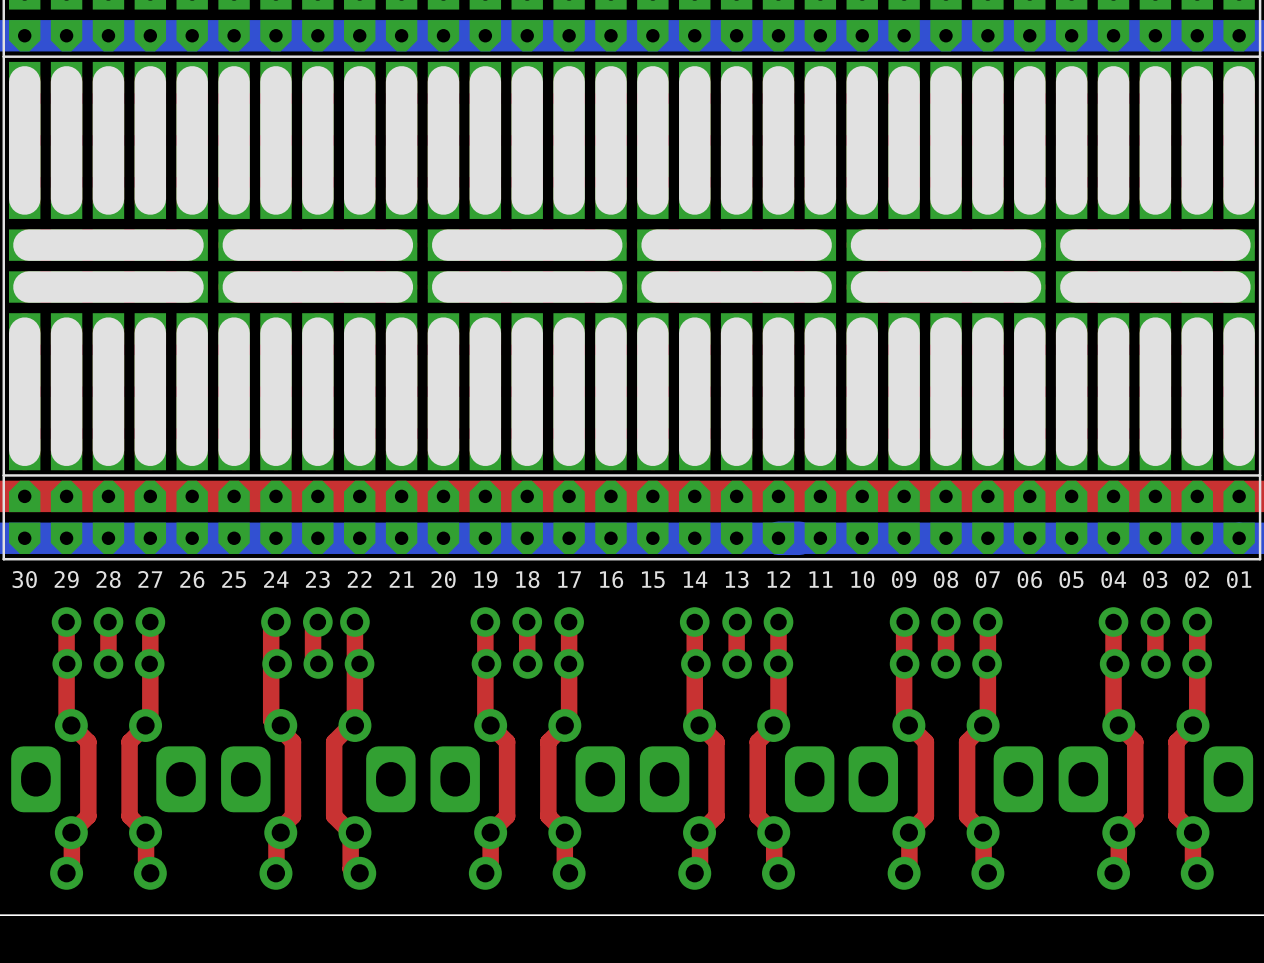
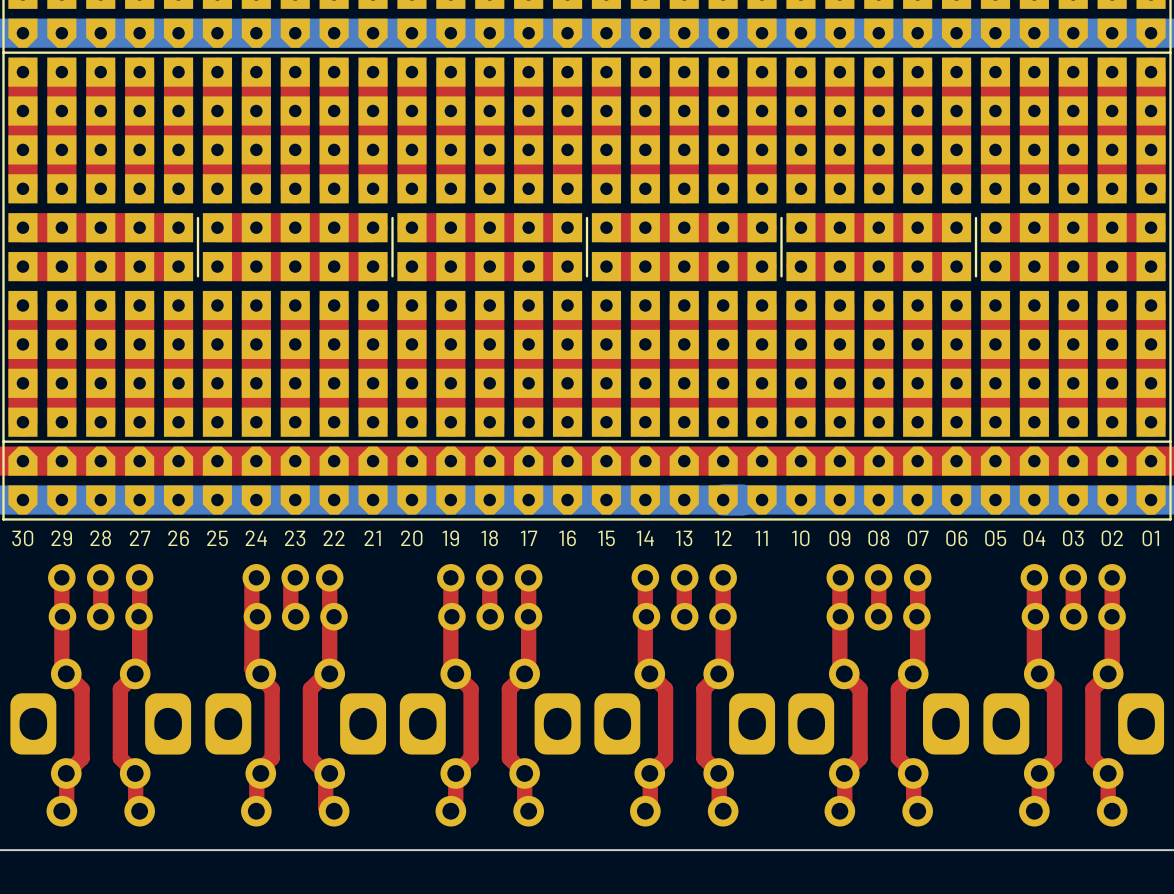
line: (24, 81) (24, 199) -> none
line: (66, 81) (66, 199) -> none
line: (108, 81) (108, 199) -> none
line: (150, 81) (150, 199) -> none
line: (192, 81) (192, 199) -> none
line: (234, 81) (234, 199) -> none
line: (275, 81) (275, 199) -> none
line: (317, 81) (317, 199) -> none
line: (359, 81) (359, 199) -> none
line: (401, 81) (401, 199) -> none
line: (443, 81) (443, 199) -> none
line: (485, 81) (485, 199) -> none
line: (527, 81) (527, 199) -> none
line: (569, 81) (569, 199) -> none
line: (610, 81) (610, 199) -> none
line: (652, 81) (652, 199) -> none
line: (694, 81) (694, 199) -> none
line: (736, 81) (736, 199) -> none
line: (778, 81) (778, 199) -> none
line: (820, 81) (820, 199) -> none
line: (862, 81) (862, 199) -> none
line: (904, 81) (904, 199) -> none
line: (946, 81) (946, 199) -> none
line: (987, 81) (987, 199) -> none
line: (1029, 81) (1029, 199) -> none
line: (1071, 81) (1071, 199) -> none
line: (1113, 81) (1113, 199) -> none
line: (1155, 81) (1155, 199) -> none
line: (1197, 81) (1197, 199) -> none
line: (1239, 81) (1239, 199) -> none
line: none -> (198, 217) (198, 276)
line: none -> (392, 217) (392, 276)
line: none -> (587, 217) (587, 276)
line: none -> (781, 217) (781, 276)
line: none -> (976, 217) (976, 276)
line: (188, 245) (28, 245) -> none
line: (397, 245) (238, 245) -> none
line: (606, 245) (447, 245) -> none
line: (816, 245) (657, 245) -> none
line: (1025, 245) (866, 245) -> none
line: (1234, 245) (1075, 245) -> none
line: (188, 287) (28, 287) -> none
line: (397, 287) (238, 287) -> none
line: (606, 287) (447, 287) -> none
line: (816, 287) (657, 287) -> none
line: (1025, 287) (866, 287) -> none
line: (1234, 287) (1075, 287) -> none
line: (24, 333) (24, 450) -> none
line: (66, 333) (66, 450) -> none
line: (108, 333) (108, 450) -> none
line: (150, 333) (150, 450) -> none
line: (192, 333) (192, 450) -> none
line: (234, 333) (234, 450) -> none
line: (275, 333) (275, 450) -> none
line: (317, 333) (317, 450) -> none
line: (359, 333) (359, 450) -> none
line: (401, 333) (401, 450) -> none
line: (443, 333) (443, 450) -> none
line: (485, 333) (485, 450) -> none
line: (527, 333) (527, 450) -> none
line: (569, 333) (569, 450) -> none
line: (610, 333) (610, 450) -> none
line: (652, 333) (652, 450) -> none
line: (694, 333) (694, 450) -> none
line: (736, 333) (736, 450) -> none
line: (778, 333) (778, 450) -> none
line: (820, 333) (820, 450) -> none
line: (862, 333) (862, 450) -> none
line: (904, 333) (904, 450) -> none
line: (946, 333) (946, 450) -> none
line: (987, 333) (987, 450) -> none
line: (1029, 333) (1029, 450) -> none
line: (1071, 333) (1071, 450) -> none
line: (1113, 333) (1113, 450) -> none
line: (1155, 333) (1155, 450) -> none
line: (1197, 333) (1197, 450) -> none
line: (1239, 333) (1239, 450) -> none

